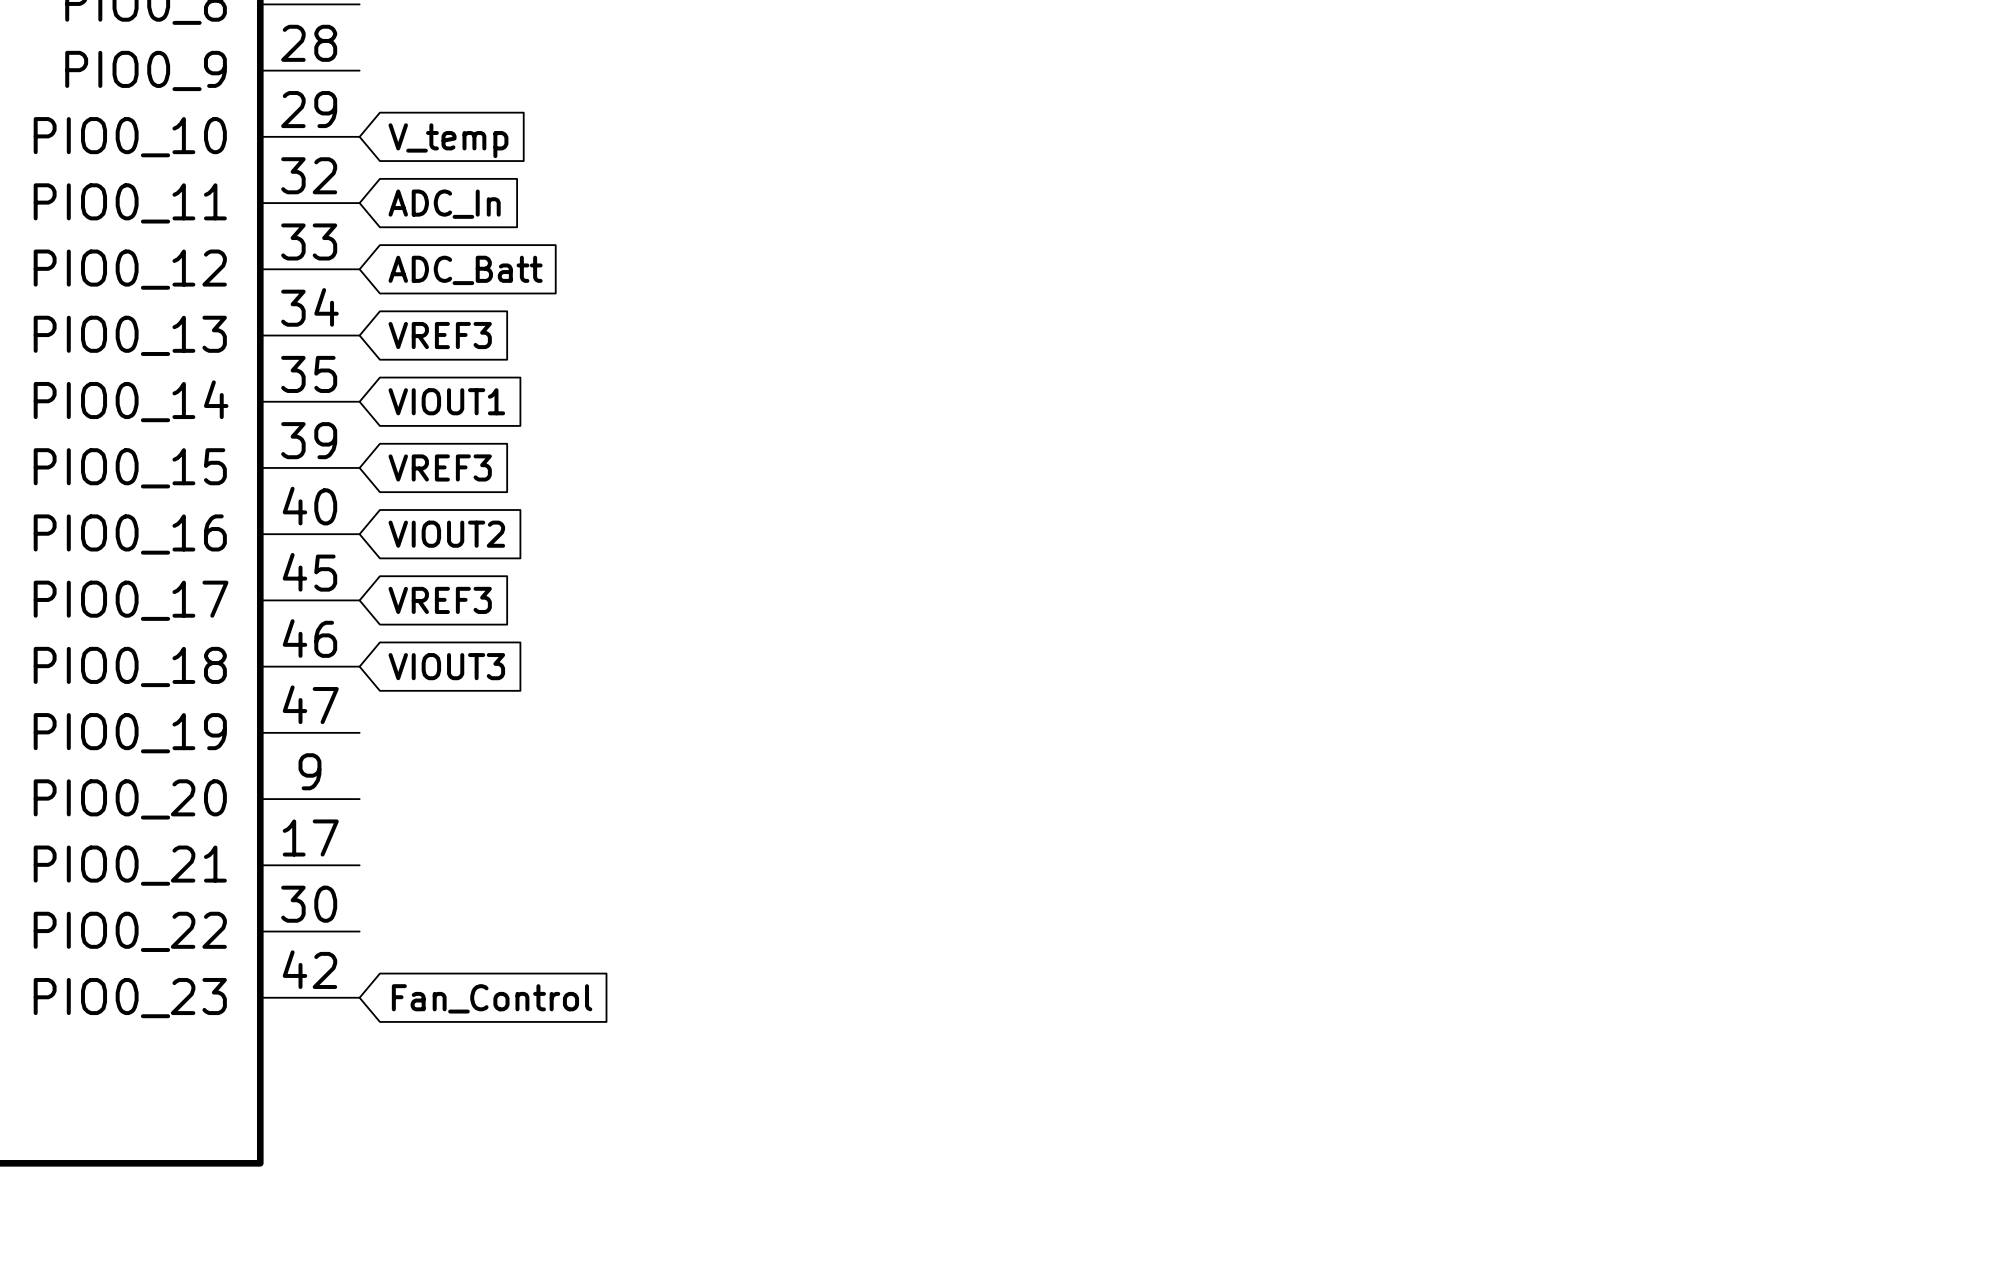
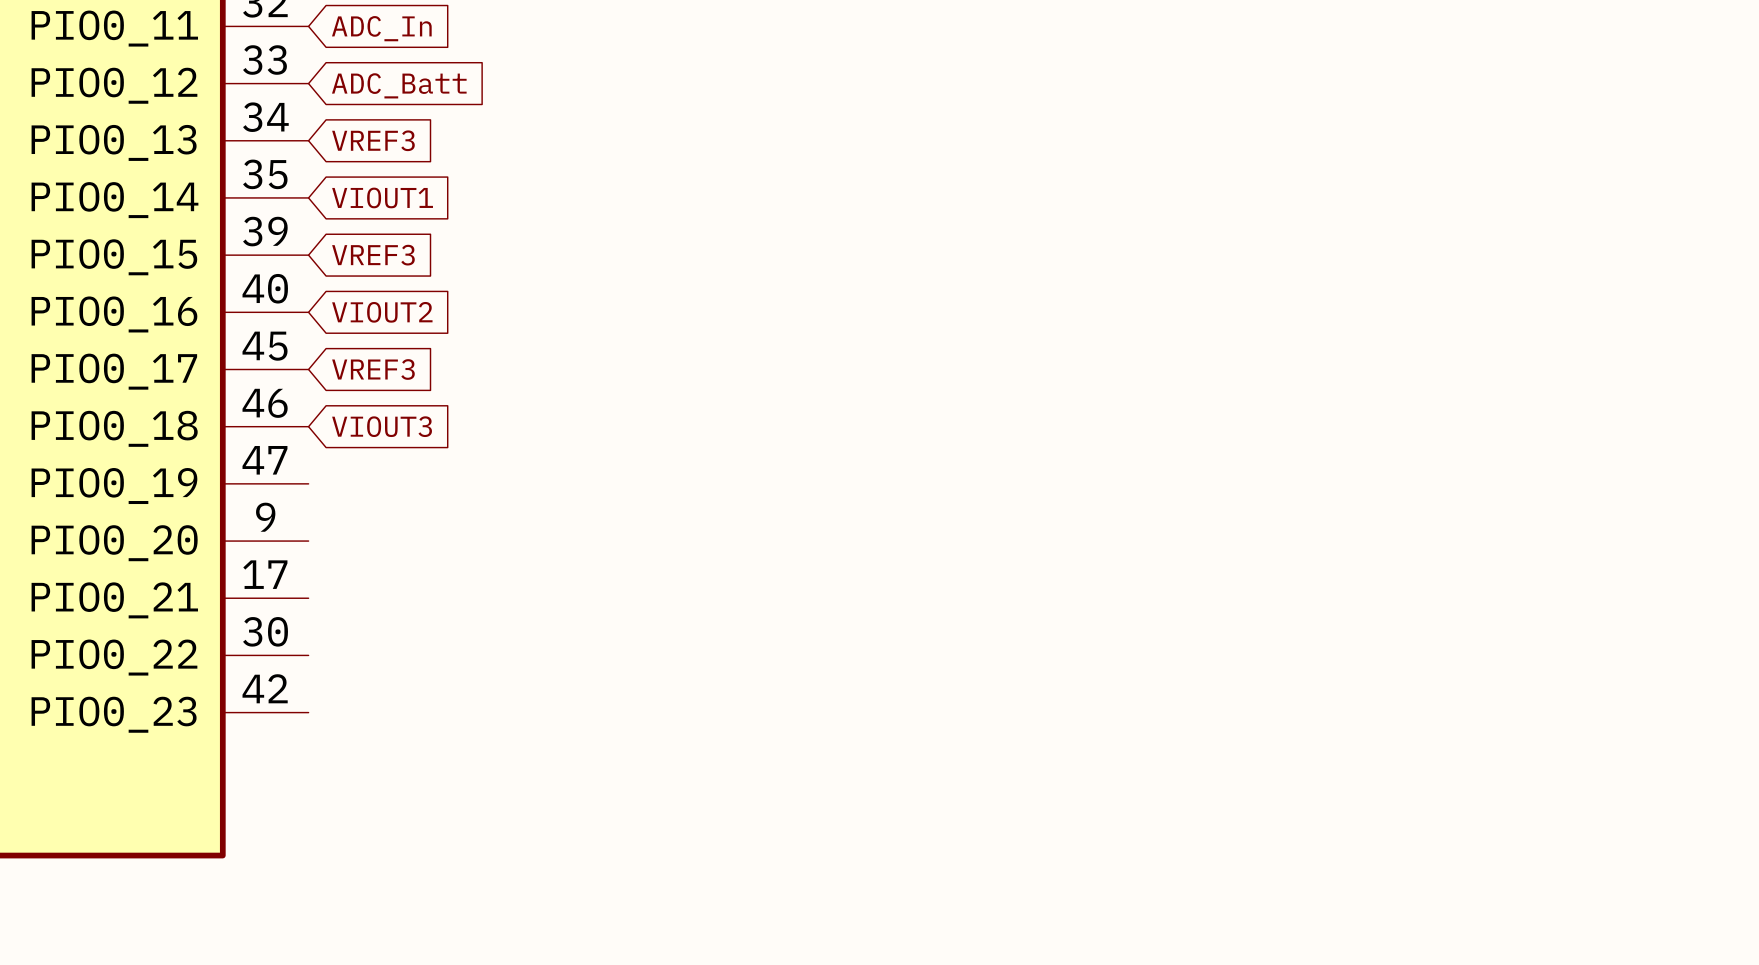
global label: Fan_Control (492, 998) -> none

